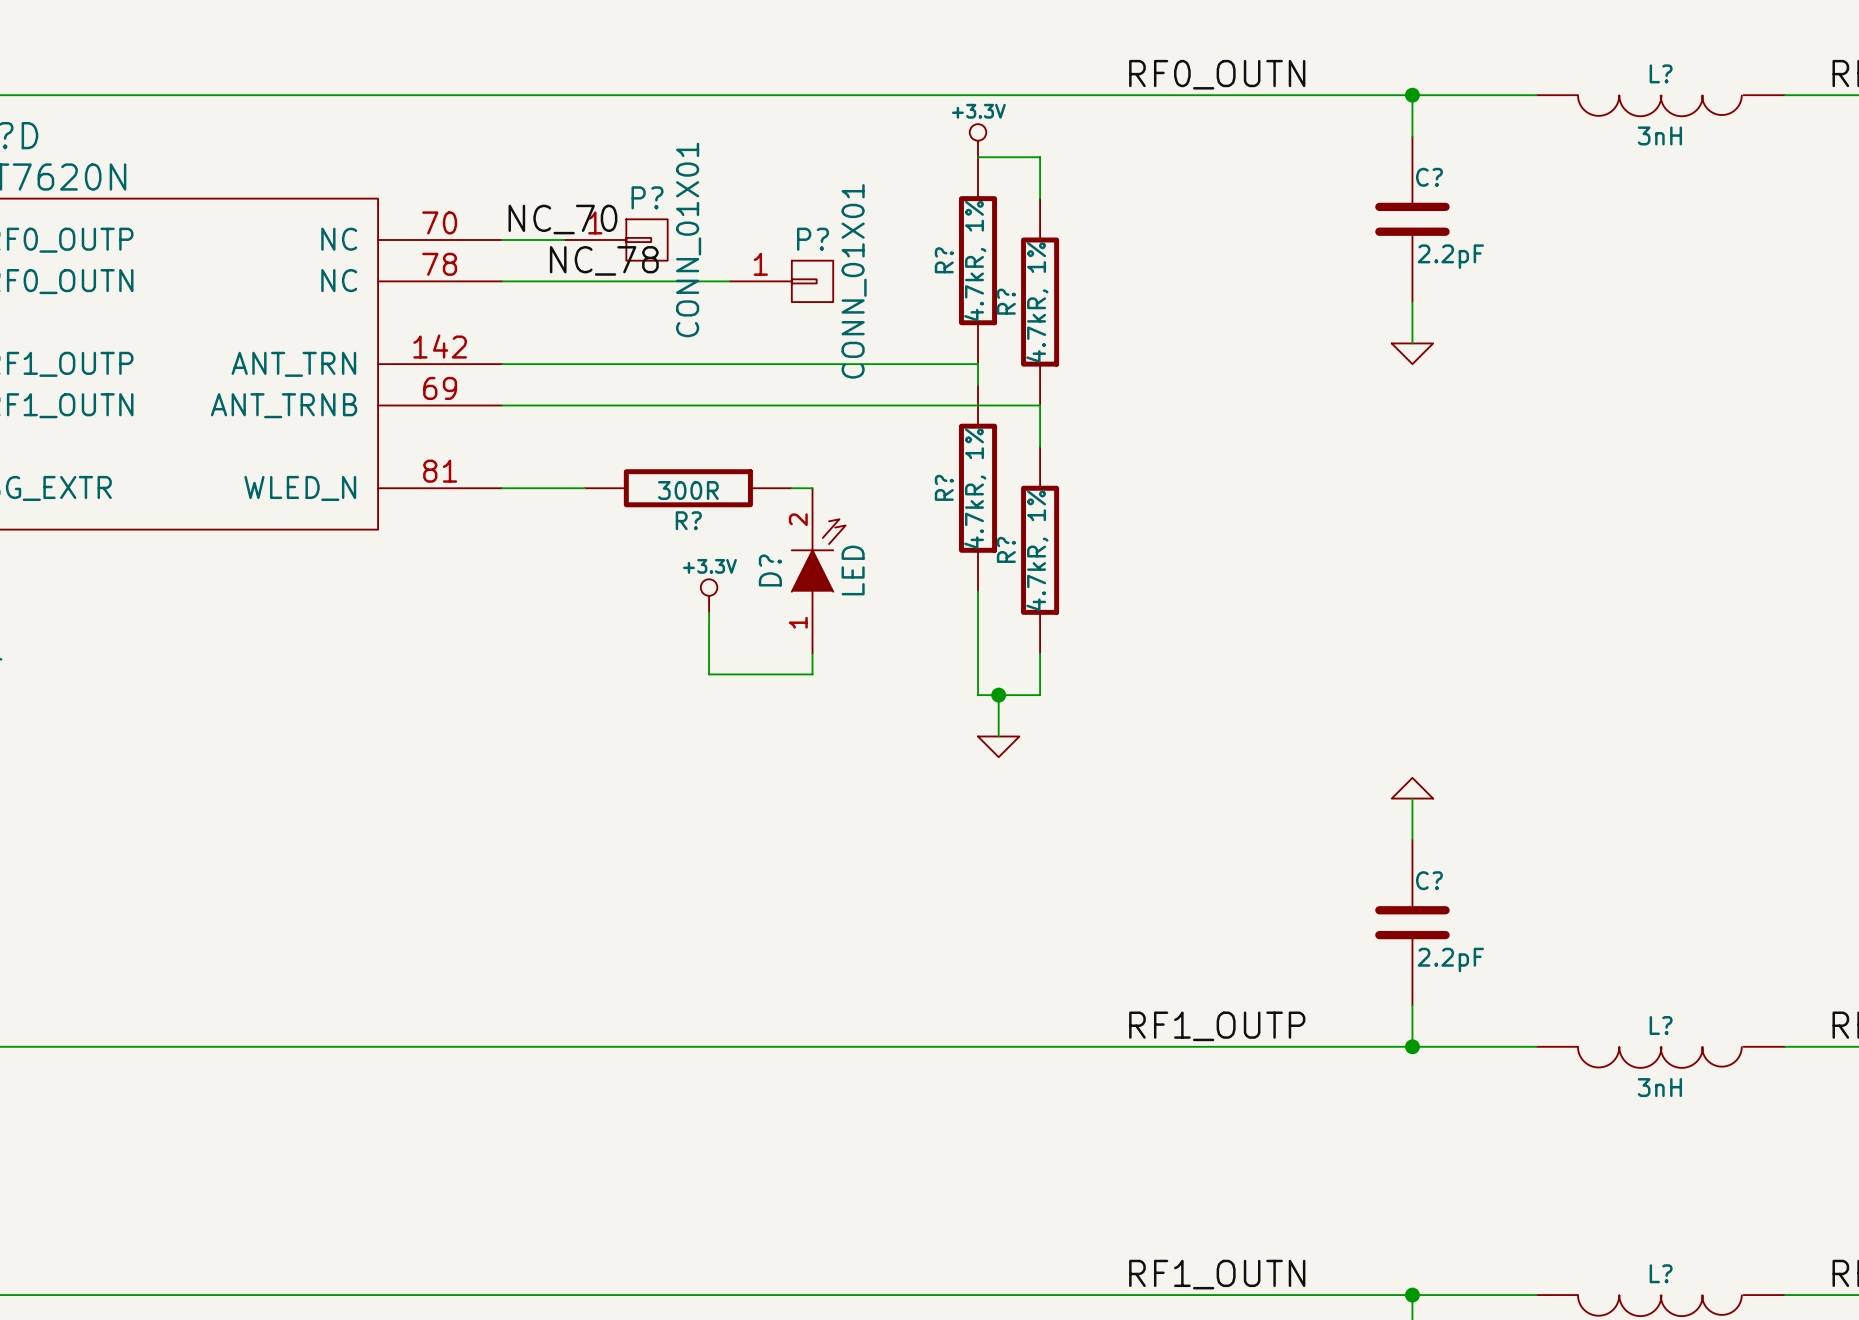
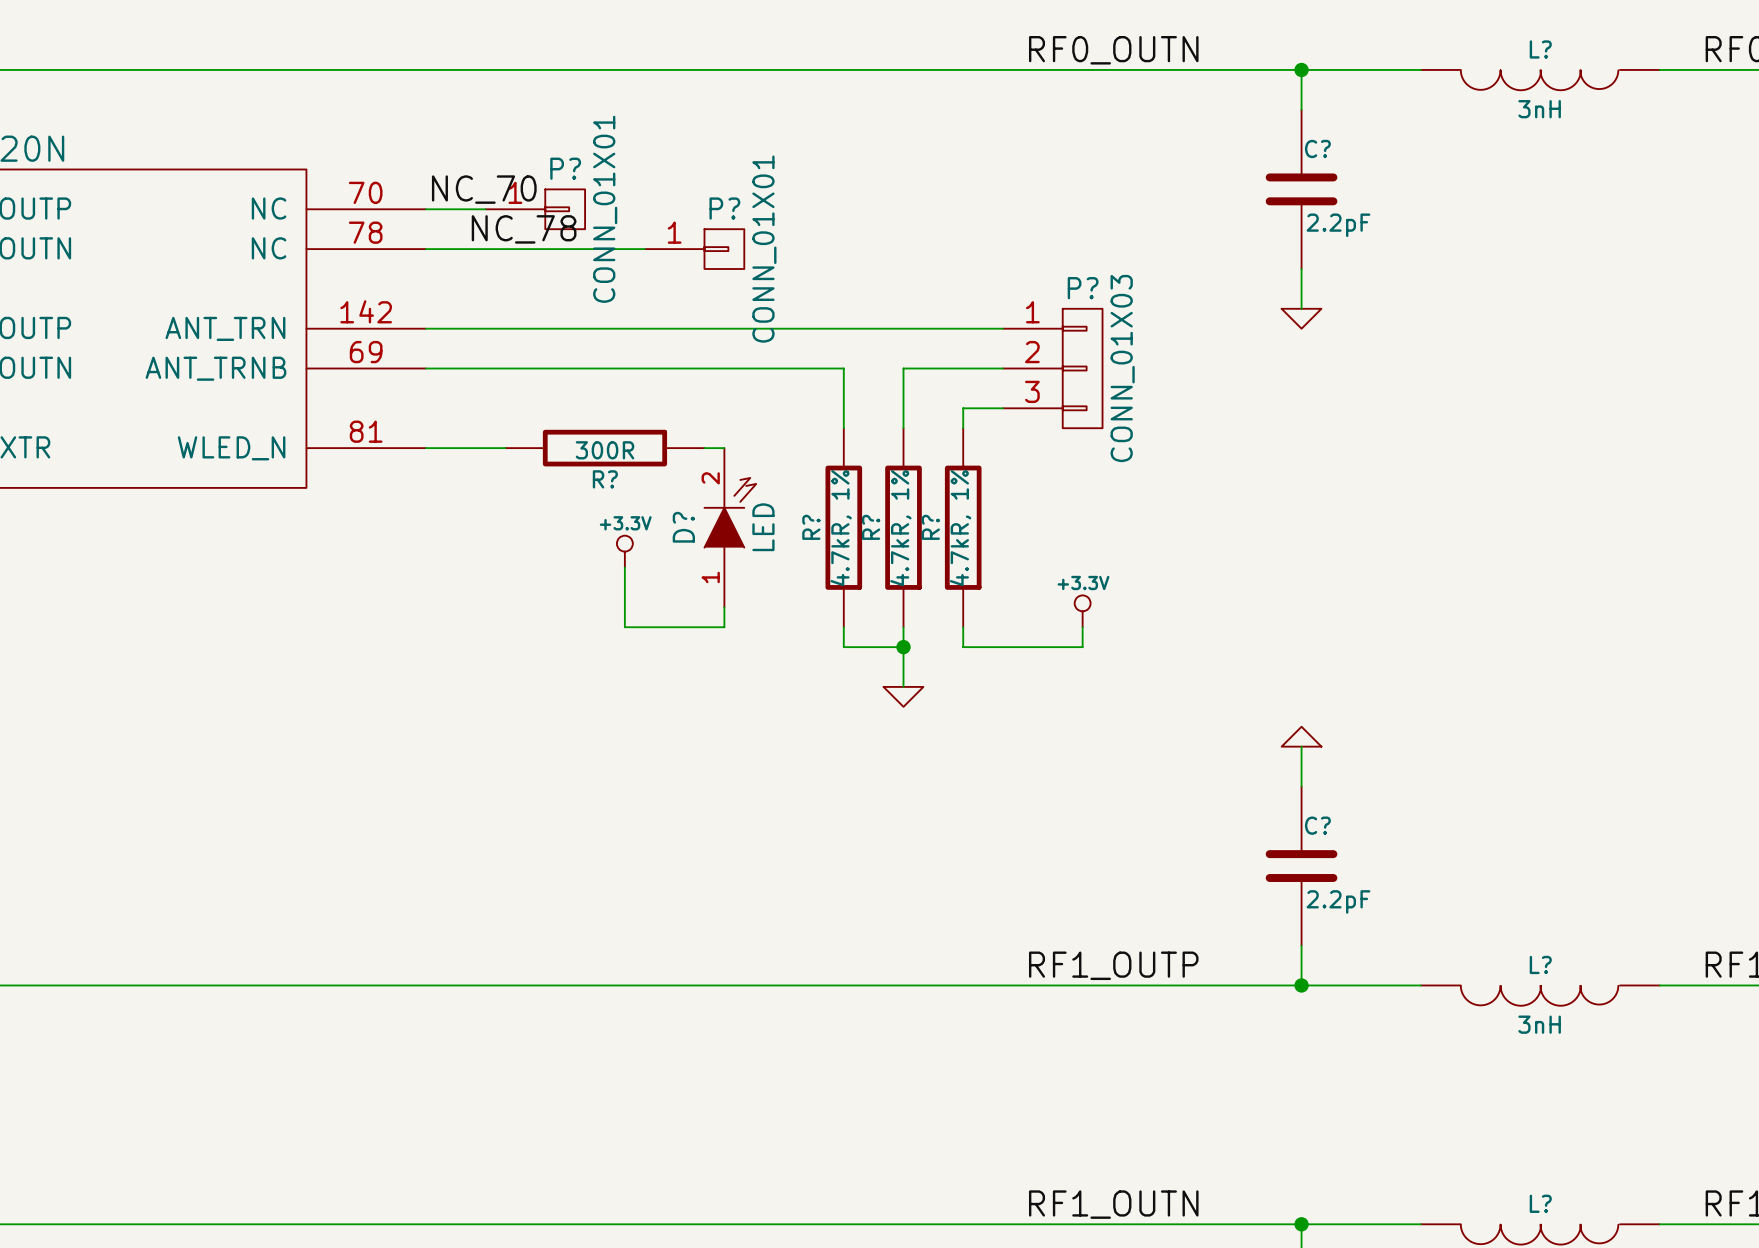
power symbol: +3.3V (978, 140) -> none
wire: (978, 157) (1040, 157) (1040, 198) -> none
R?: 4.7kR, 1% (978, 260) -> none
R?: 4.7kR, 1% (1040, 302) -> none
wire: (978, 364) (978, 384) -> (883, 328) (1003, 328)
wire: (936, 405) (998, 405) -> (843, 368) (843, 428)
wire: none -> (903, 368) (903, 428)
wire: (1040, 405) (1040, 446) -> (943, 368) (1003, 368)
P?: none -> CONN_01X03 (1052, 368)
wire: none -> (1003, 408) (963, 408) (963, 428)
R?: 4.7kR, 1% (978, 488) -> none
R?: 4.7kR, 1% (1040, 550) -> none
R?: none -> 4.7kR, 1% (843, 527)
R?: none -> 4.7kR, 1% (903, 527)
R?: none -> 4.7kR, 1% (963, 527)
wire: (978, 591) (978, 695) -> (843, 627) (843, 647) (883, 647)
wire: (1040, 653) (1040, 695) (998, 695) -> (903, 627) (903, 647)
power symbol: none -> +3.3V (1082, 611)
wire: none -> (963, 627) (963, 647) (1082, 647) (1082, 627)

